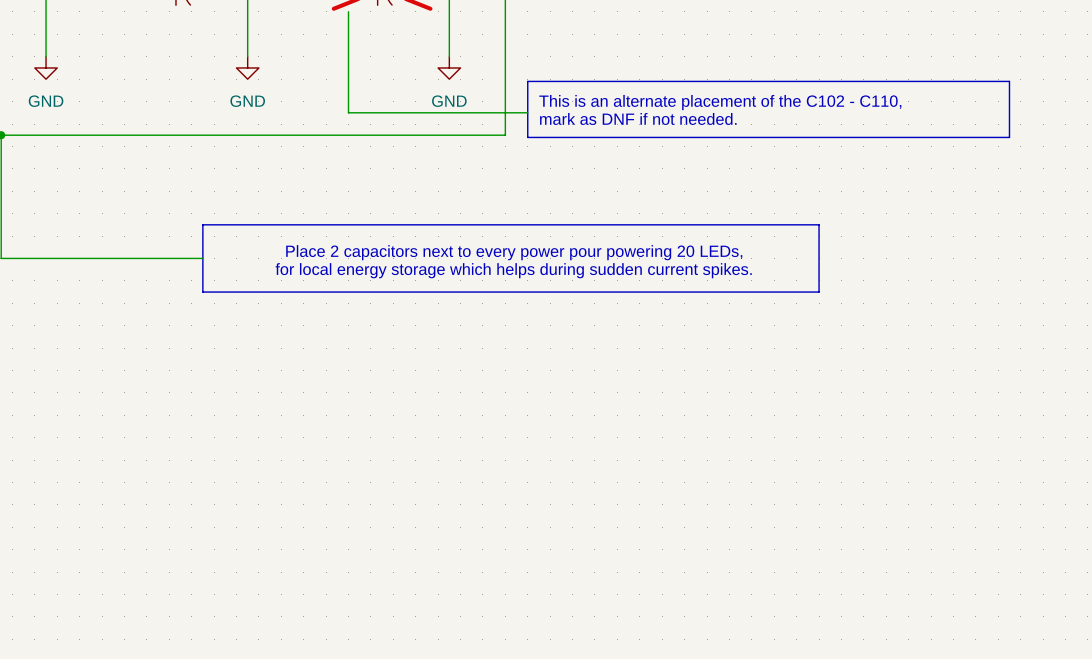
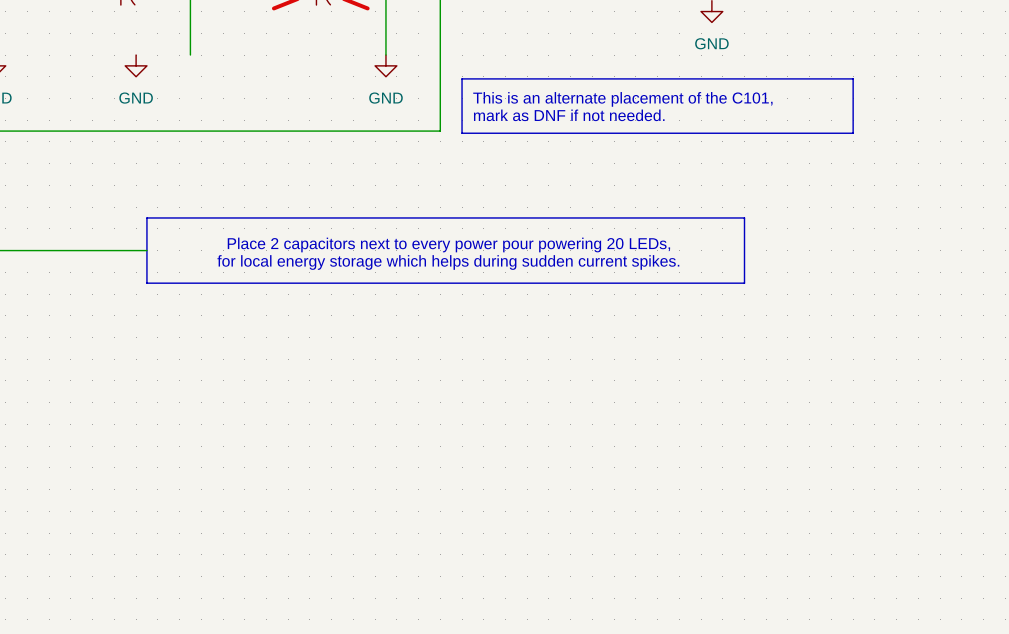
wire: (348, 11) (348, 112) (527, 112) -> none
power symbol: none -> GND (711, 11)
power symbol position: GND (247, 67) -> GND (136, 65)
line: (931, 81) (1009, 81) (1009, 137) (931, 137) -> (853, 78) (853, 133)
text: This is an alternate placement of the C102 - C110, (720, 102) -> This is an alternate placement of the C101, (622, 99)

